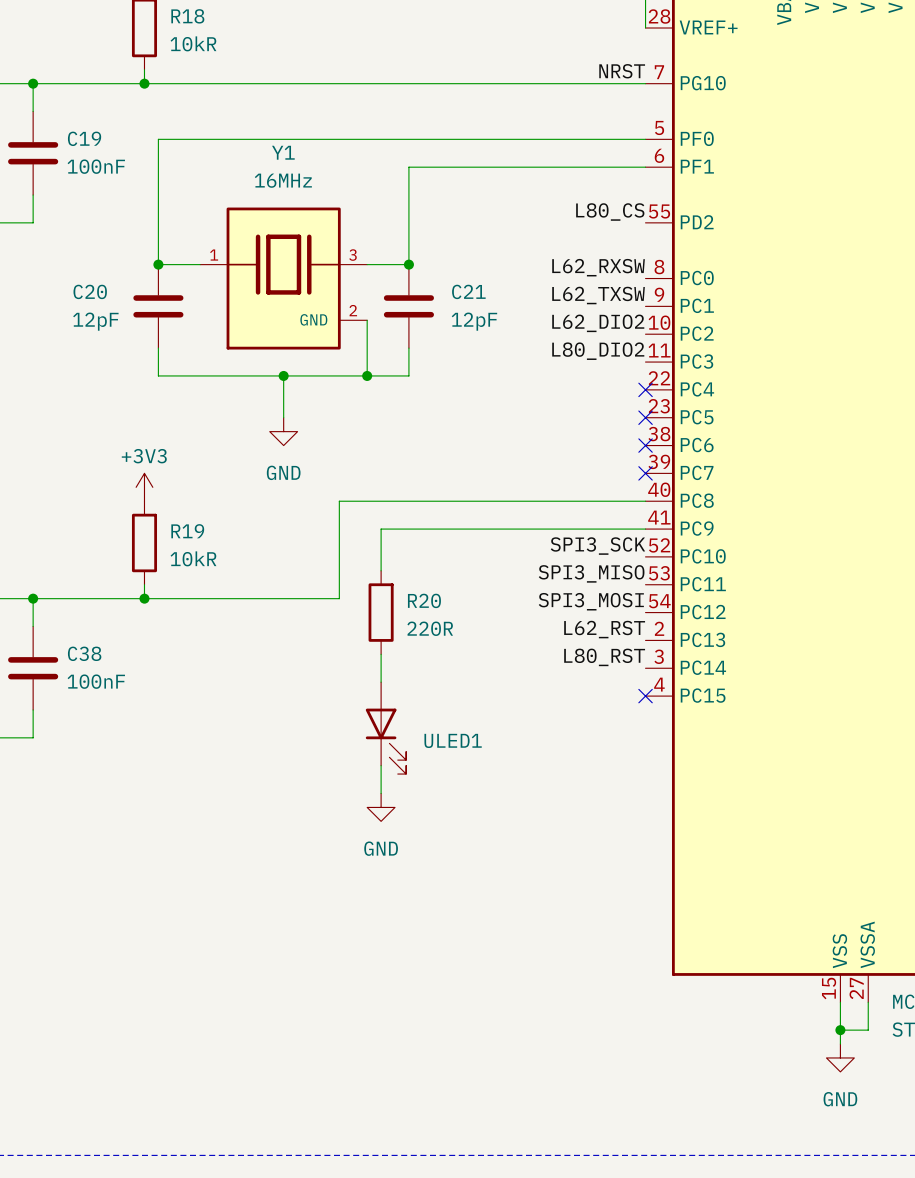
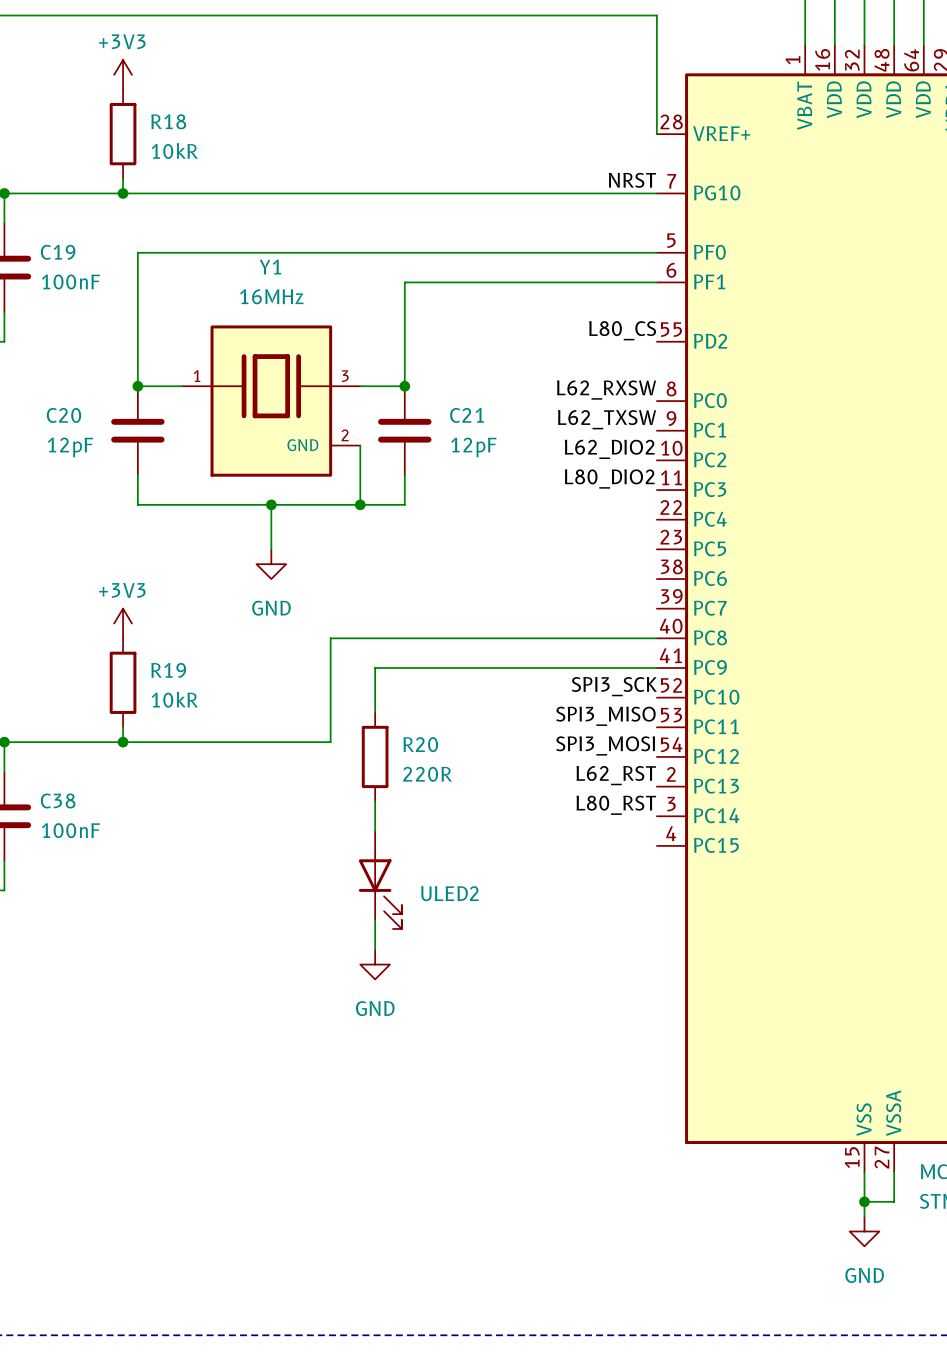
no-connect mark: (645, 389) -> none
no-connect mark: (645, 417) -> none
no-connect mark: (645, 445) -> none
no-connect mark: (645, 473) -> none
no-connect mark: (645, 696) -> none
ULED1 name: ULED1 (453, 740) -> ULED2 (449, 893)

